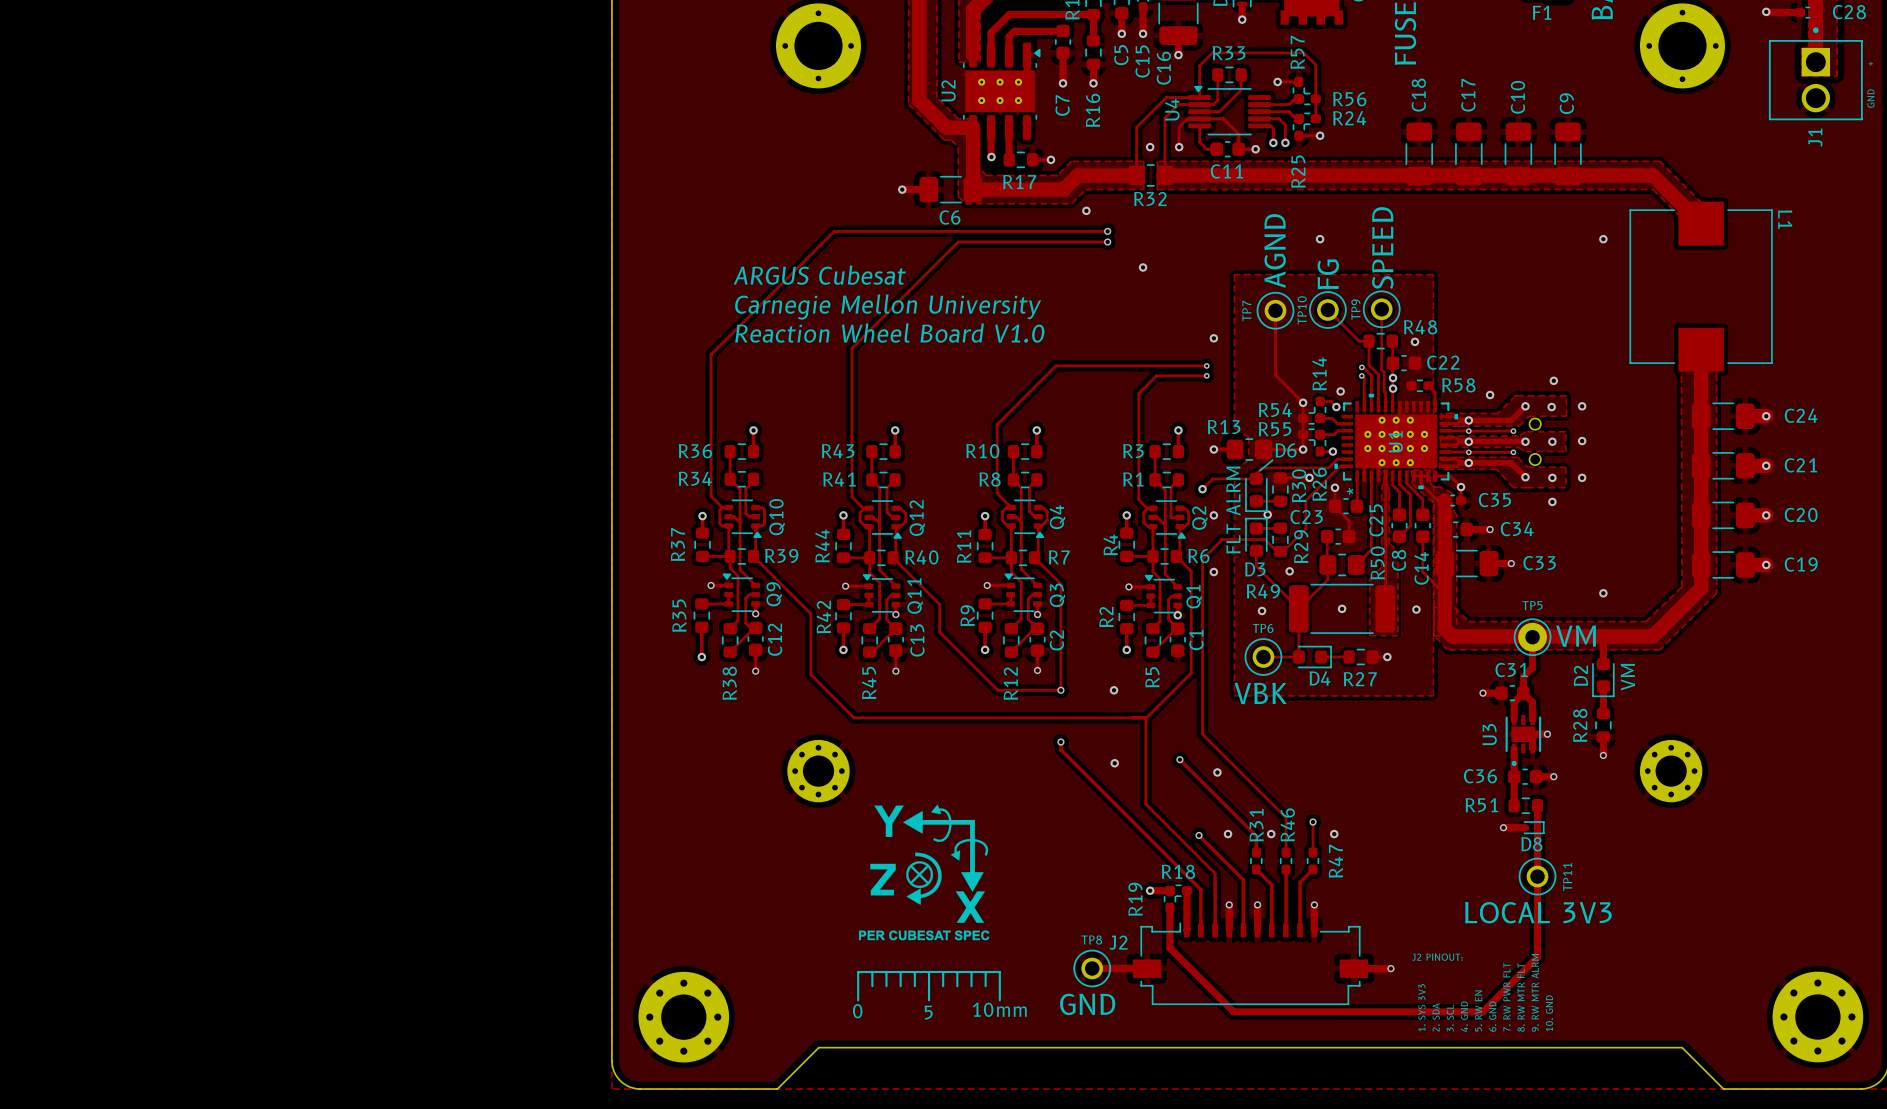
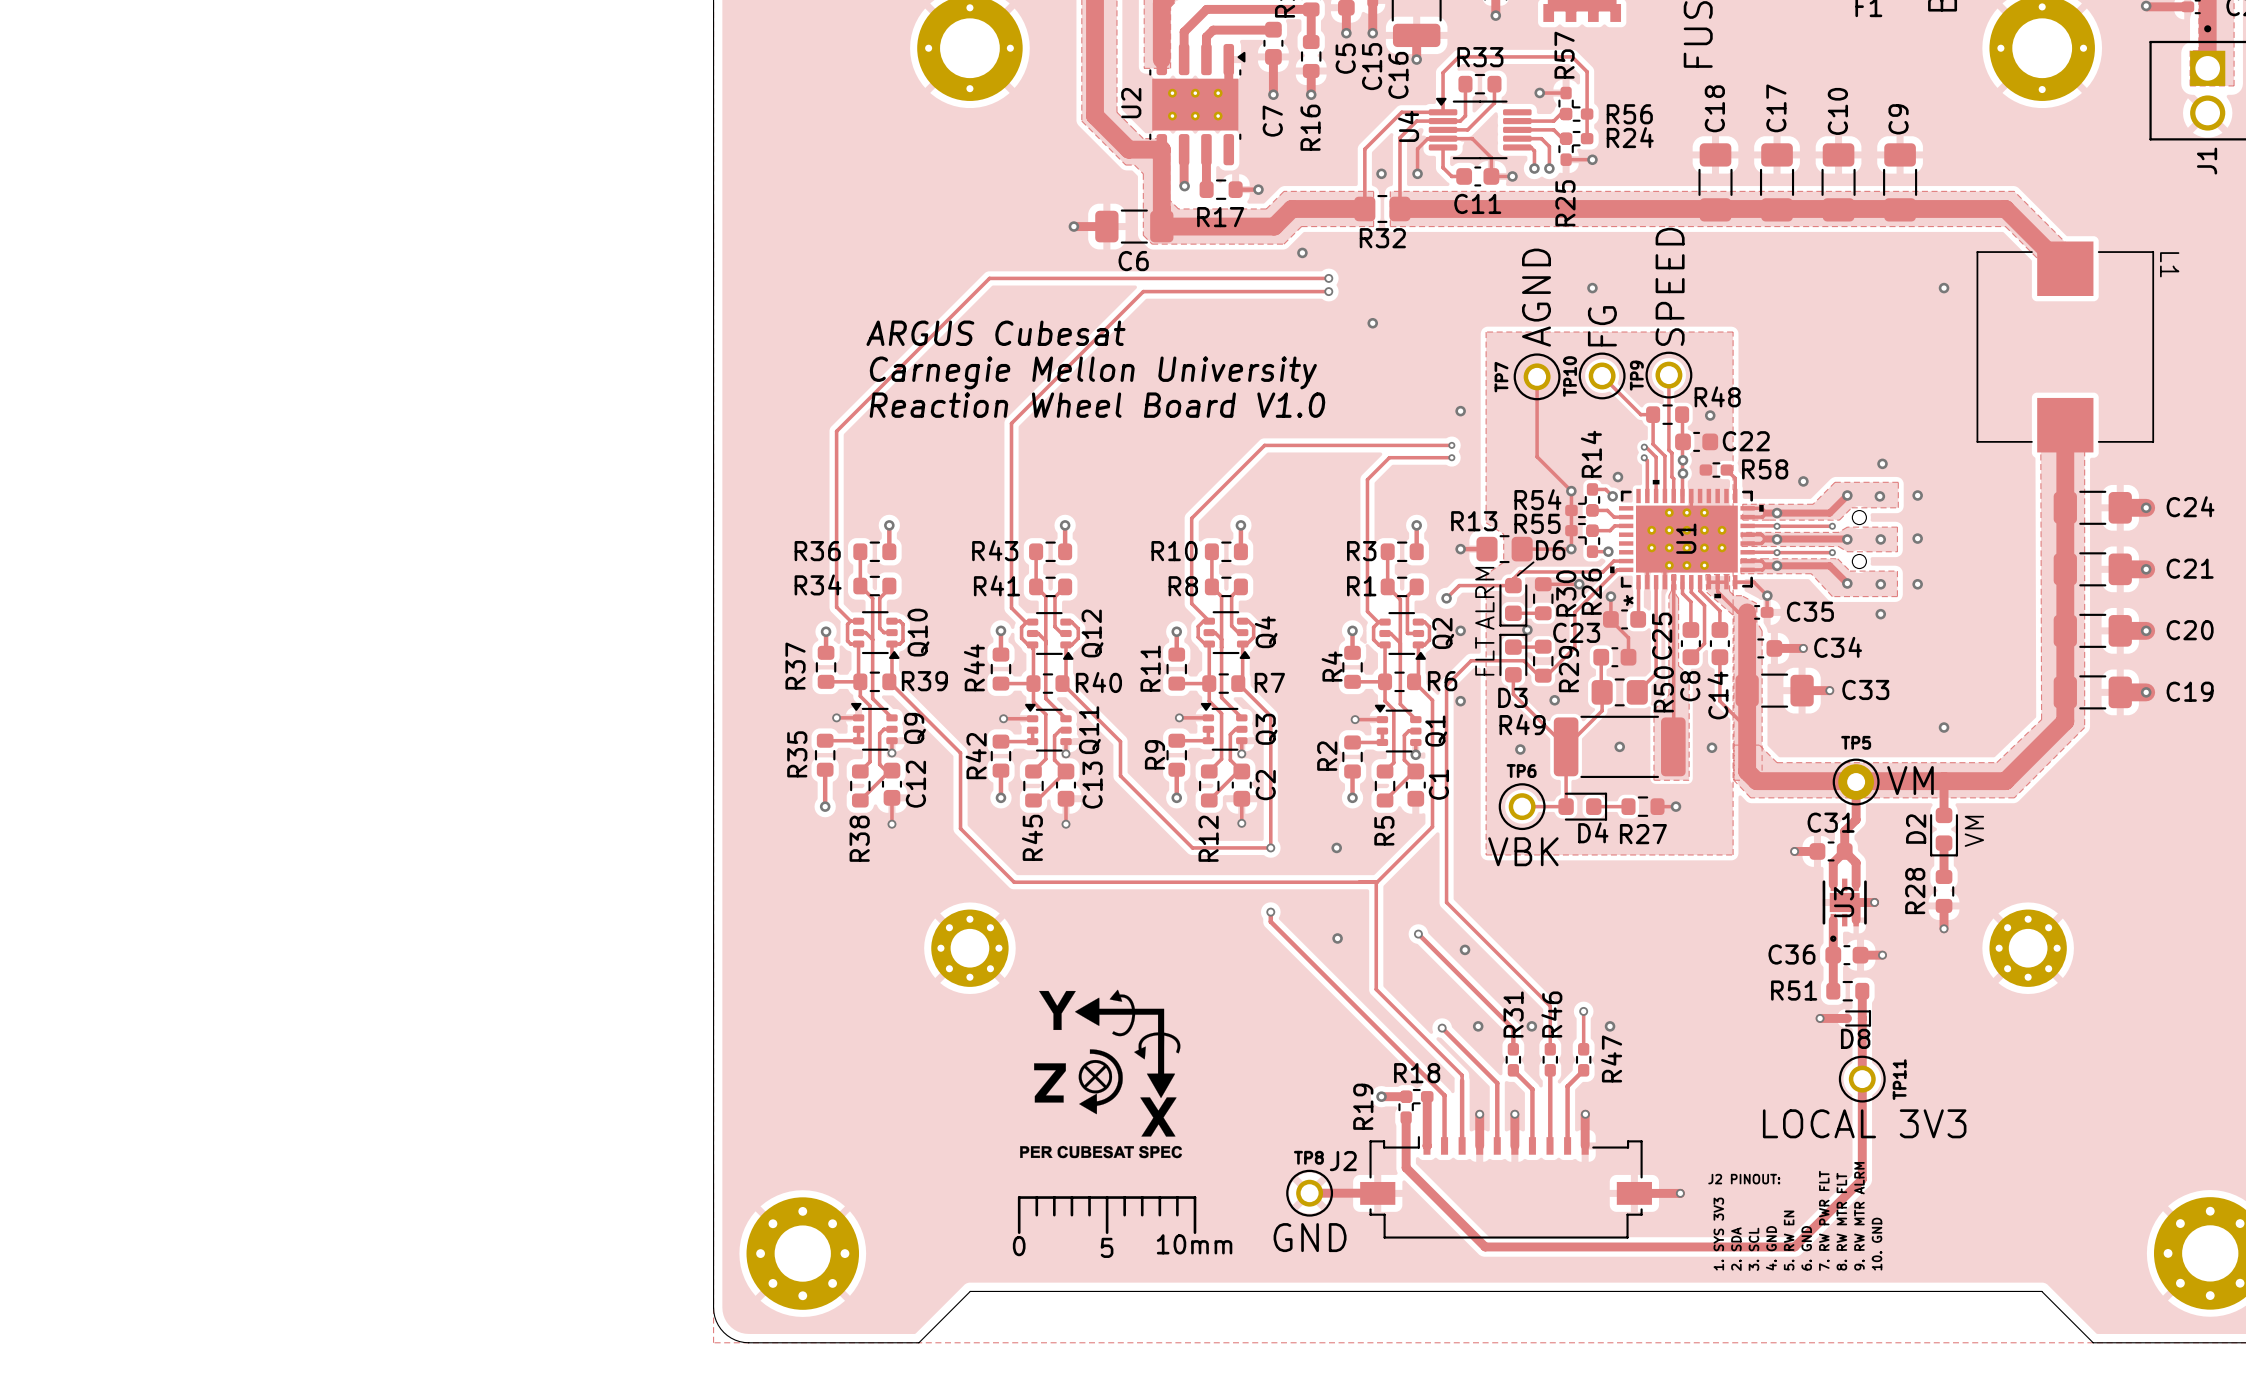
U3 name position: U3 (1489, 734) -> U3 (1844, 902)

